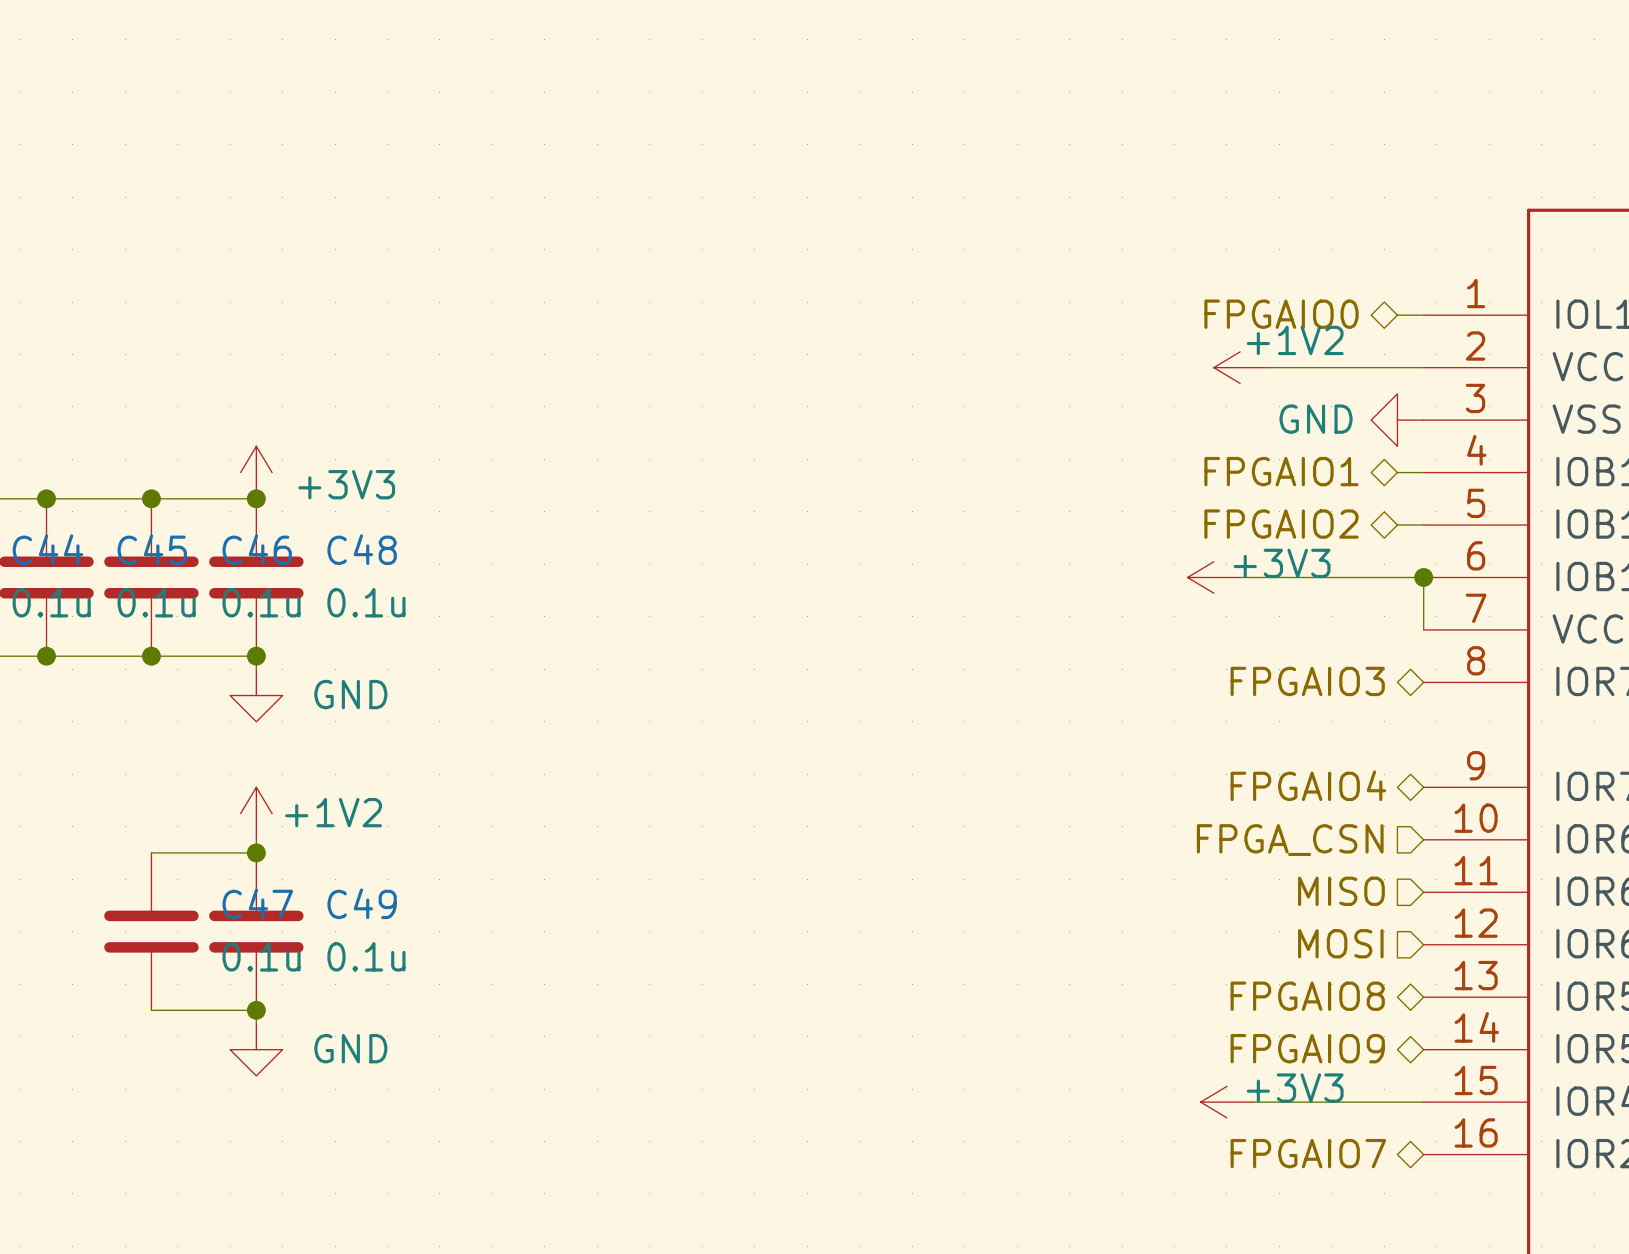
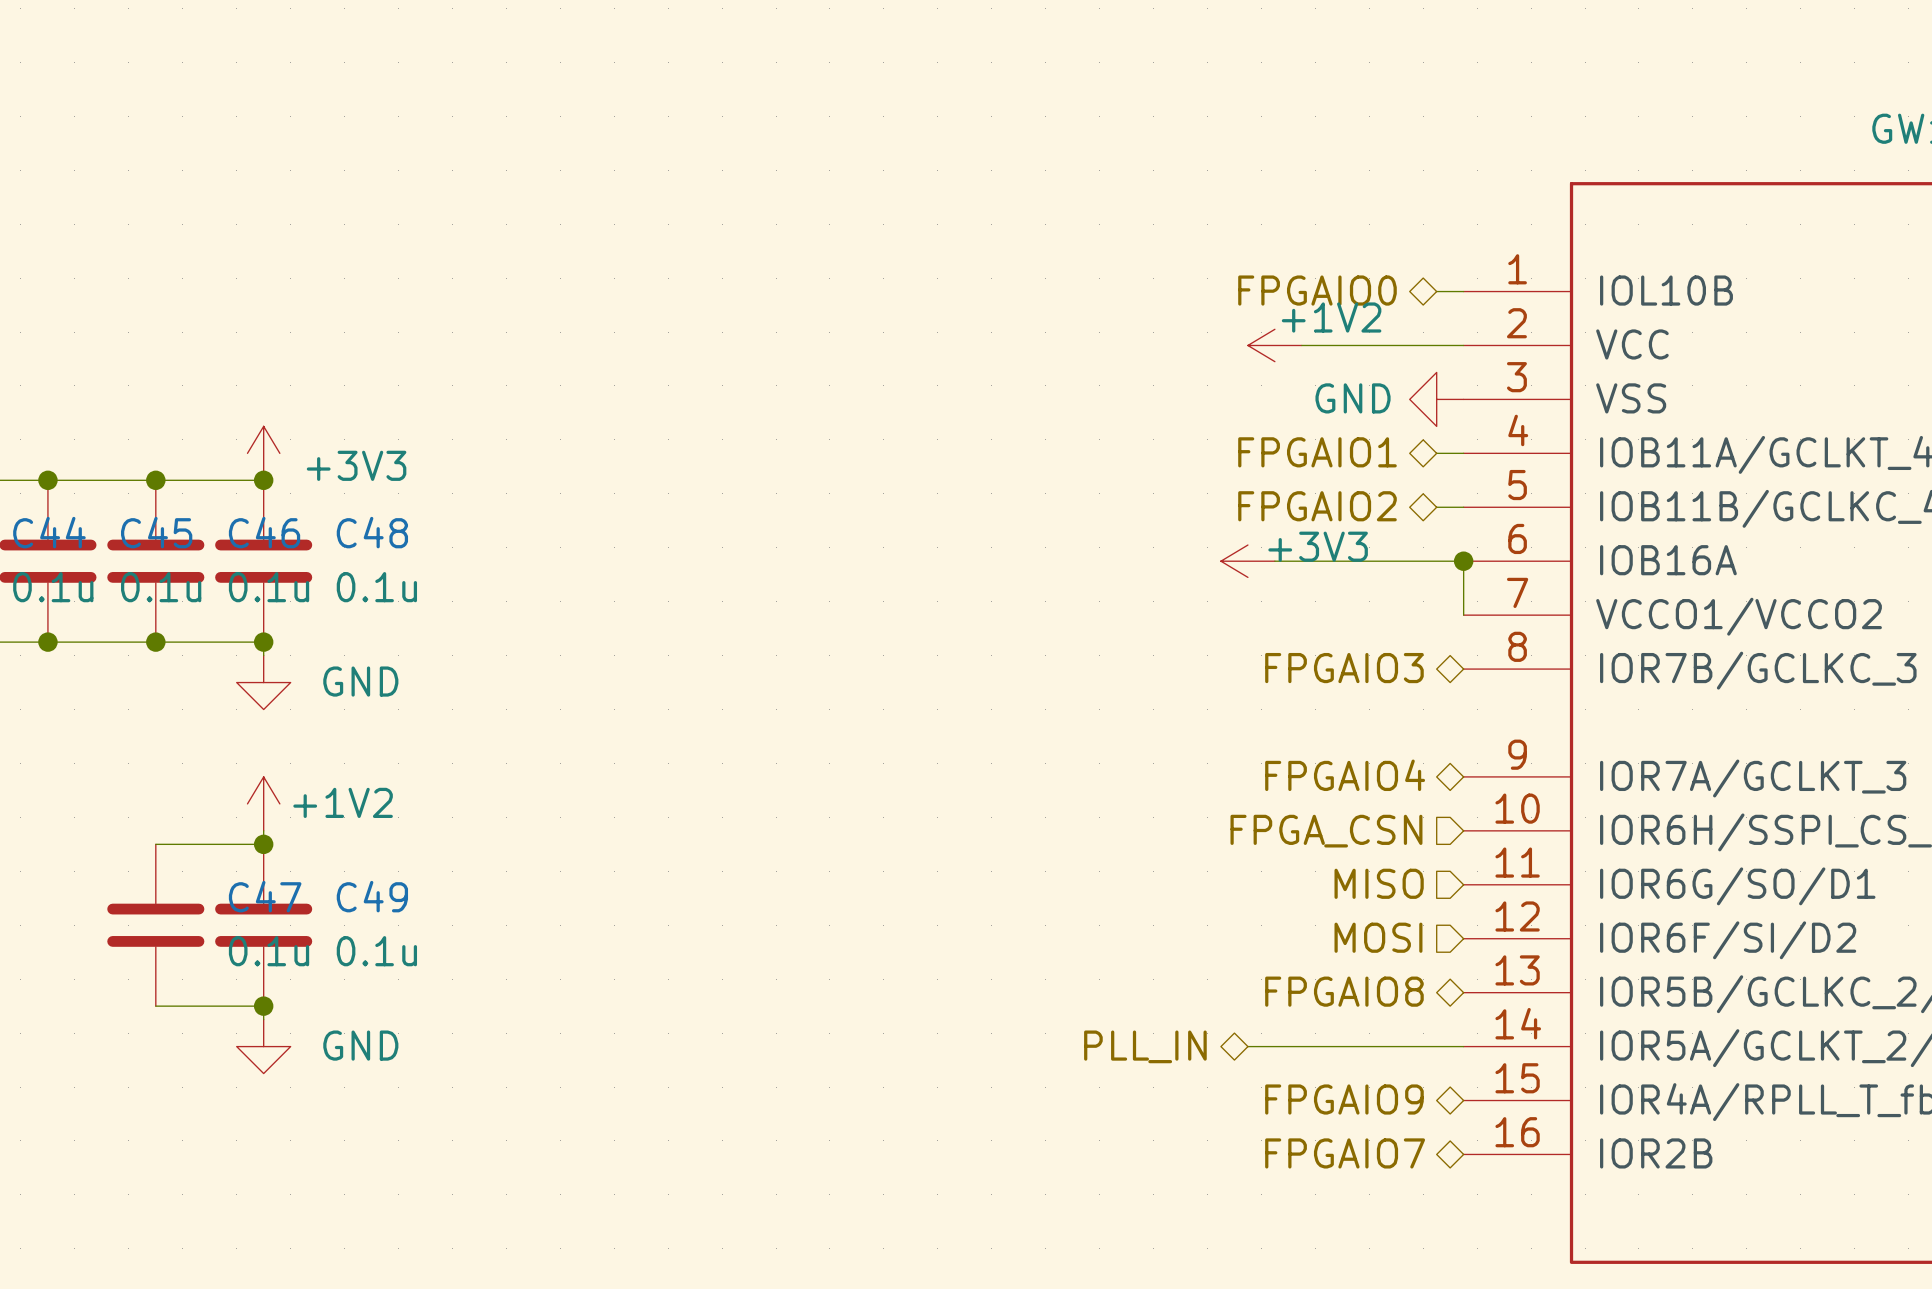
hierarchical label position: FPGAIO9 (1307, 1048) -> FPGAIO9 (1344, 1099)
hierarchical label: none -> PLL_IN (1145, 1046)
wire: none -> (1247, 1046) (1463, 1046)
power symbol: +3V3 (1226, 1102) -> none
wire: (1253, 1102) (1423, 1102) -> none

